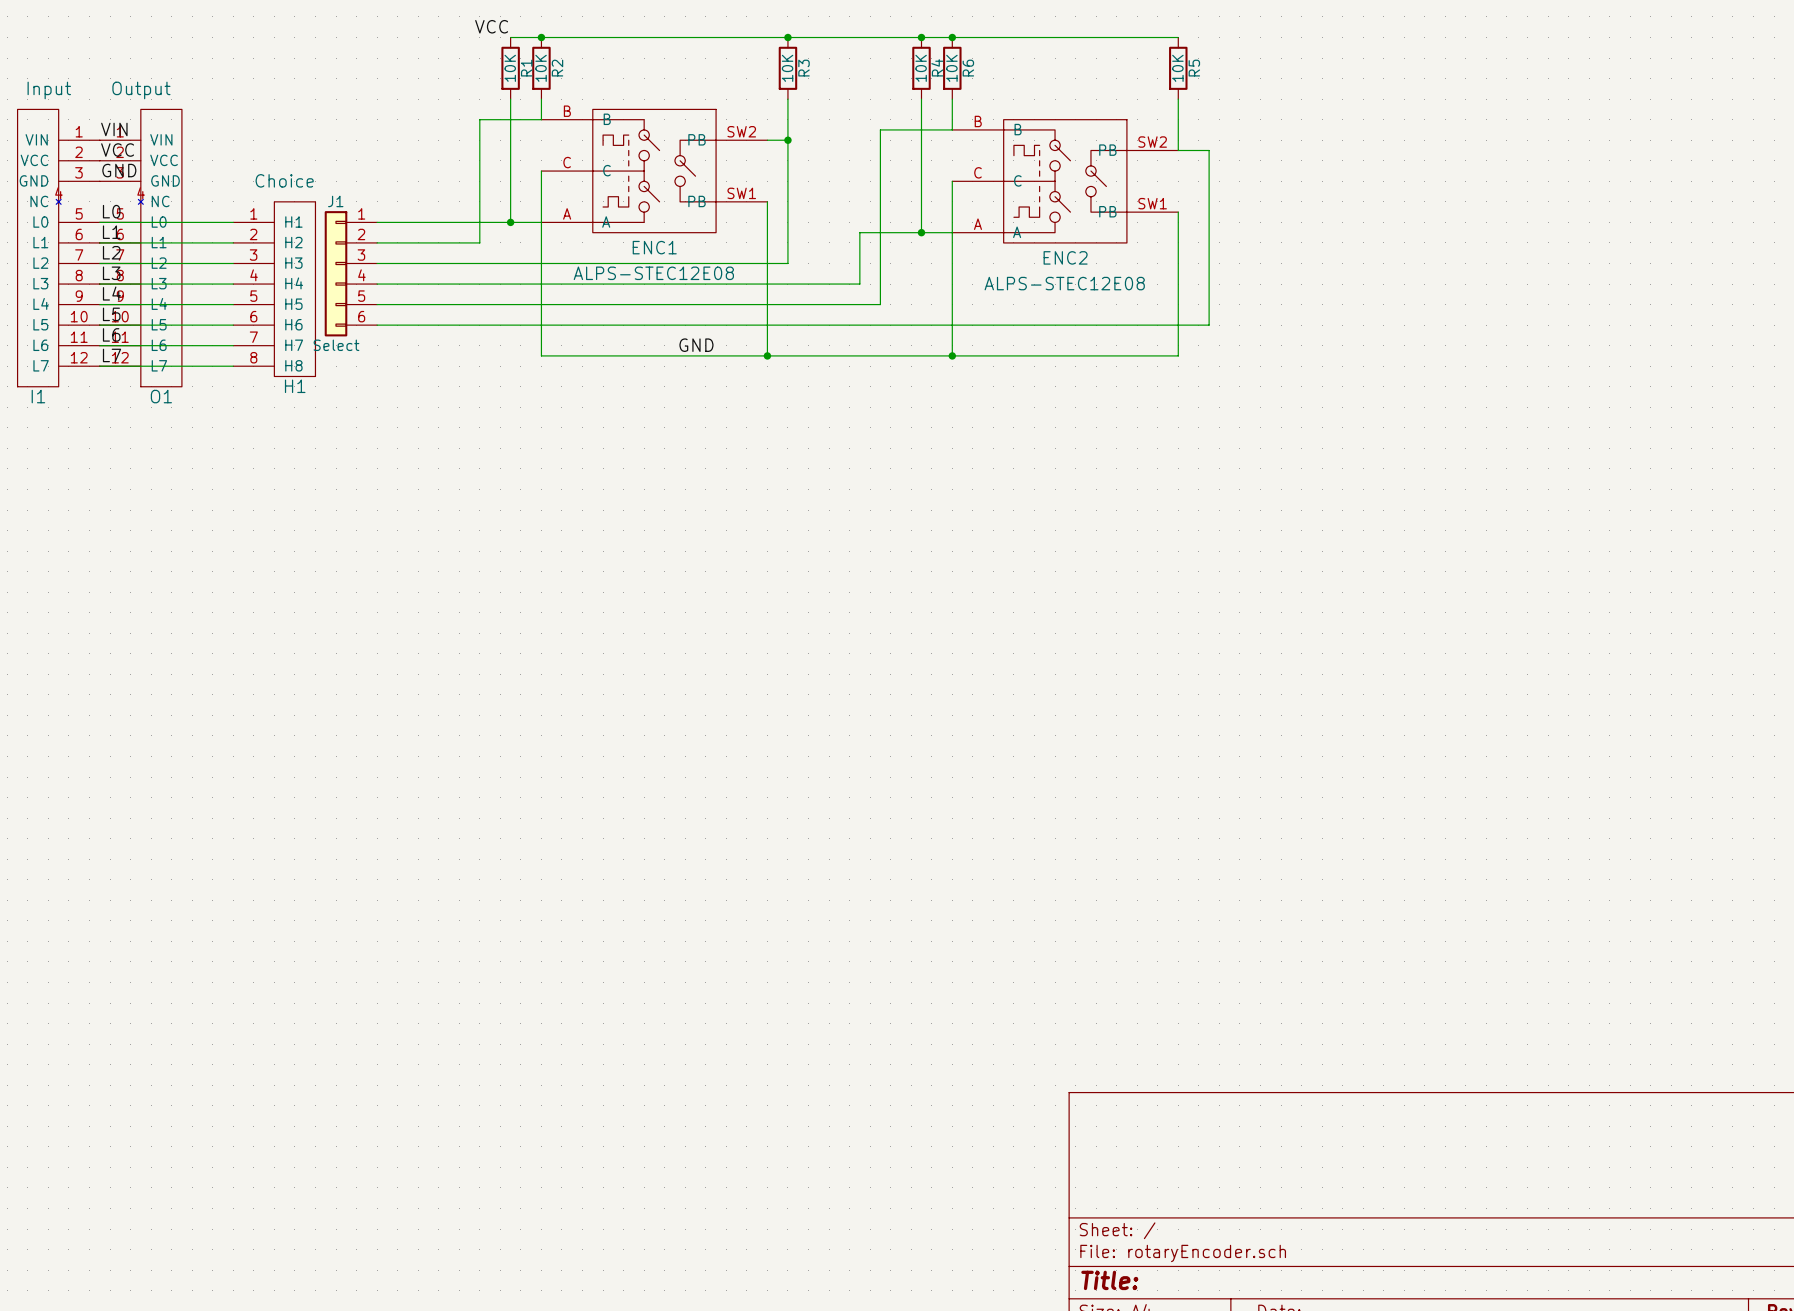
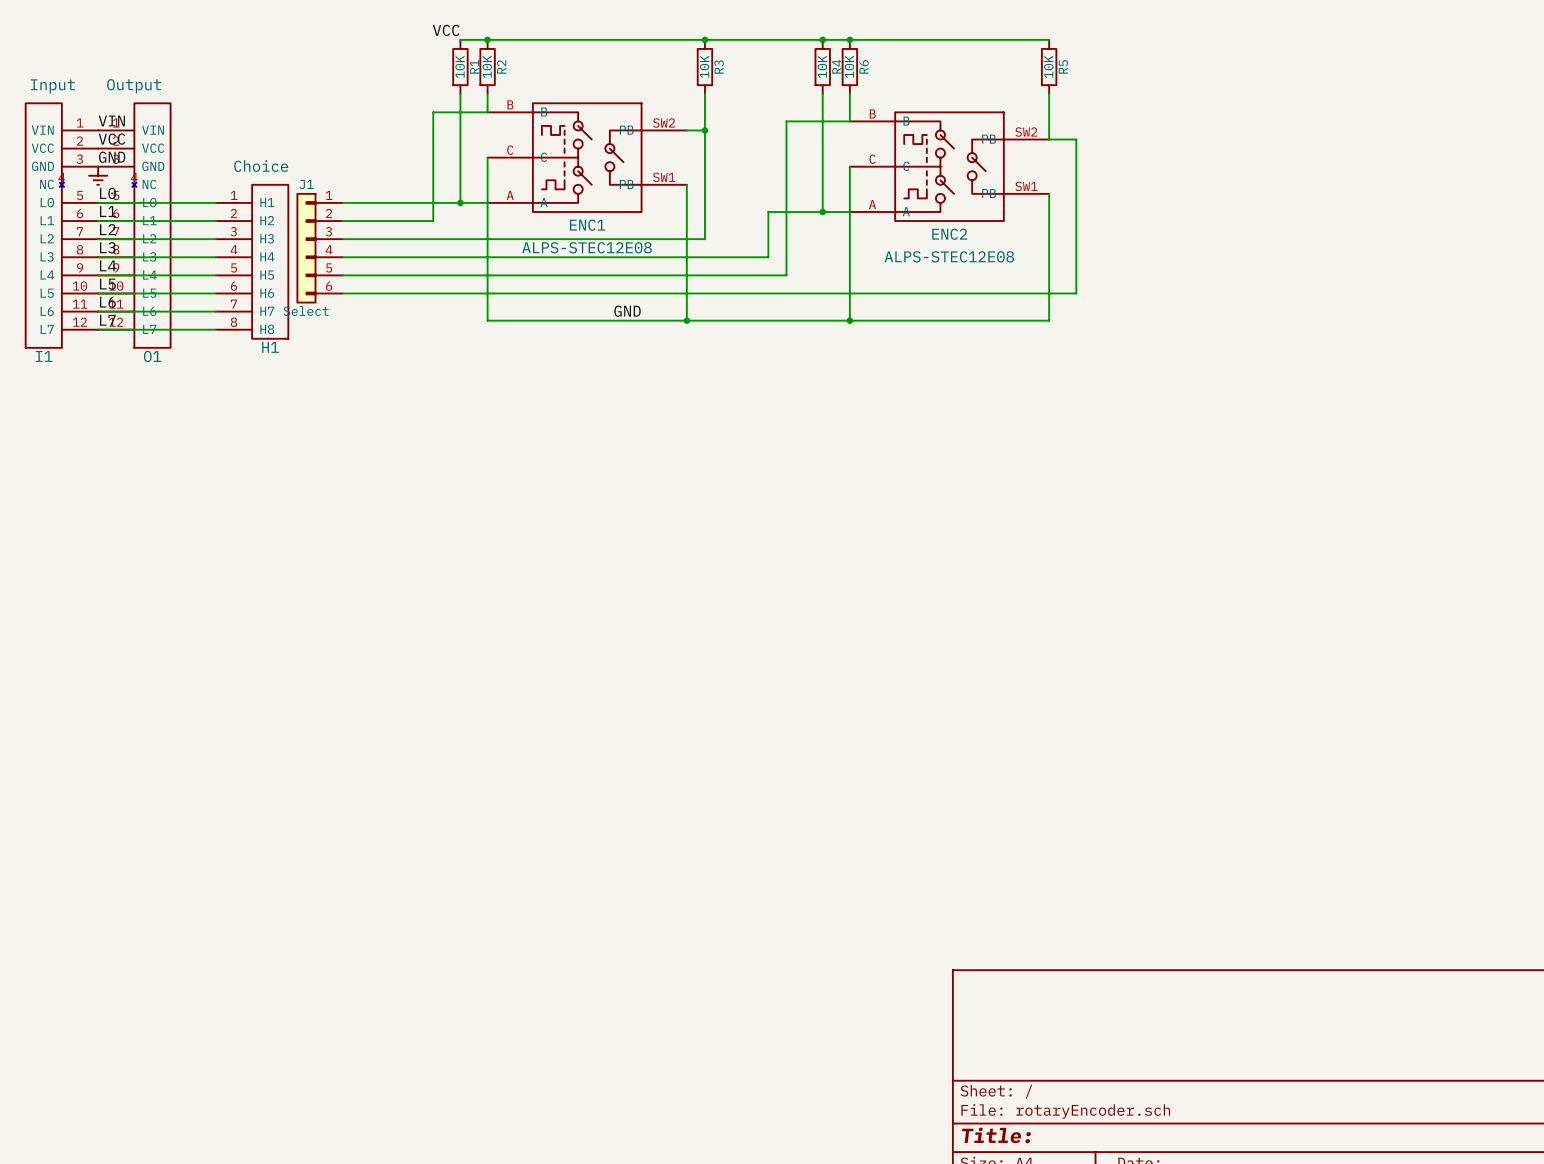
power symbol: none -> (98, 175)

